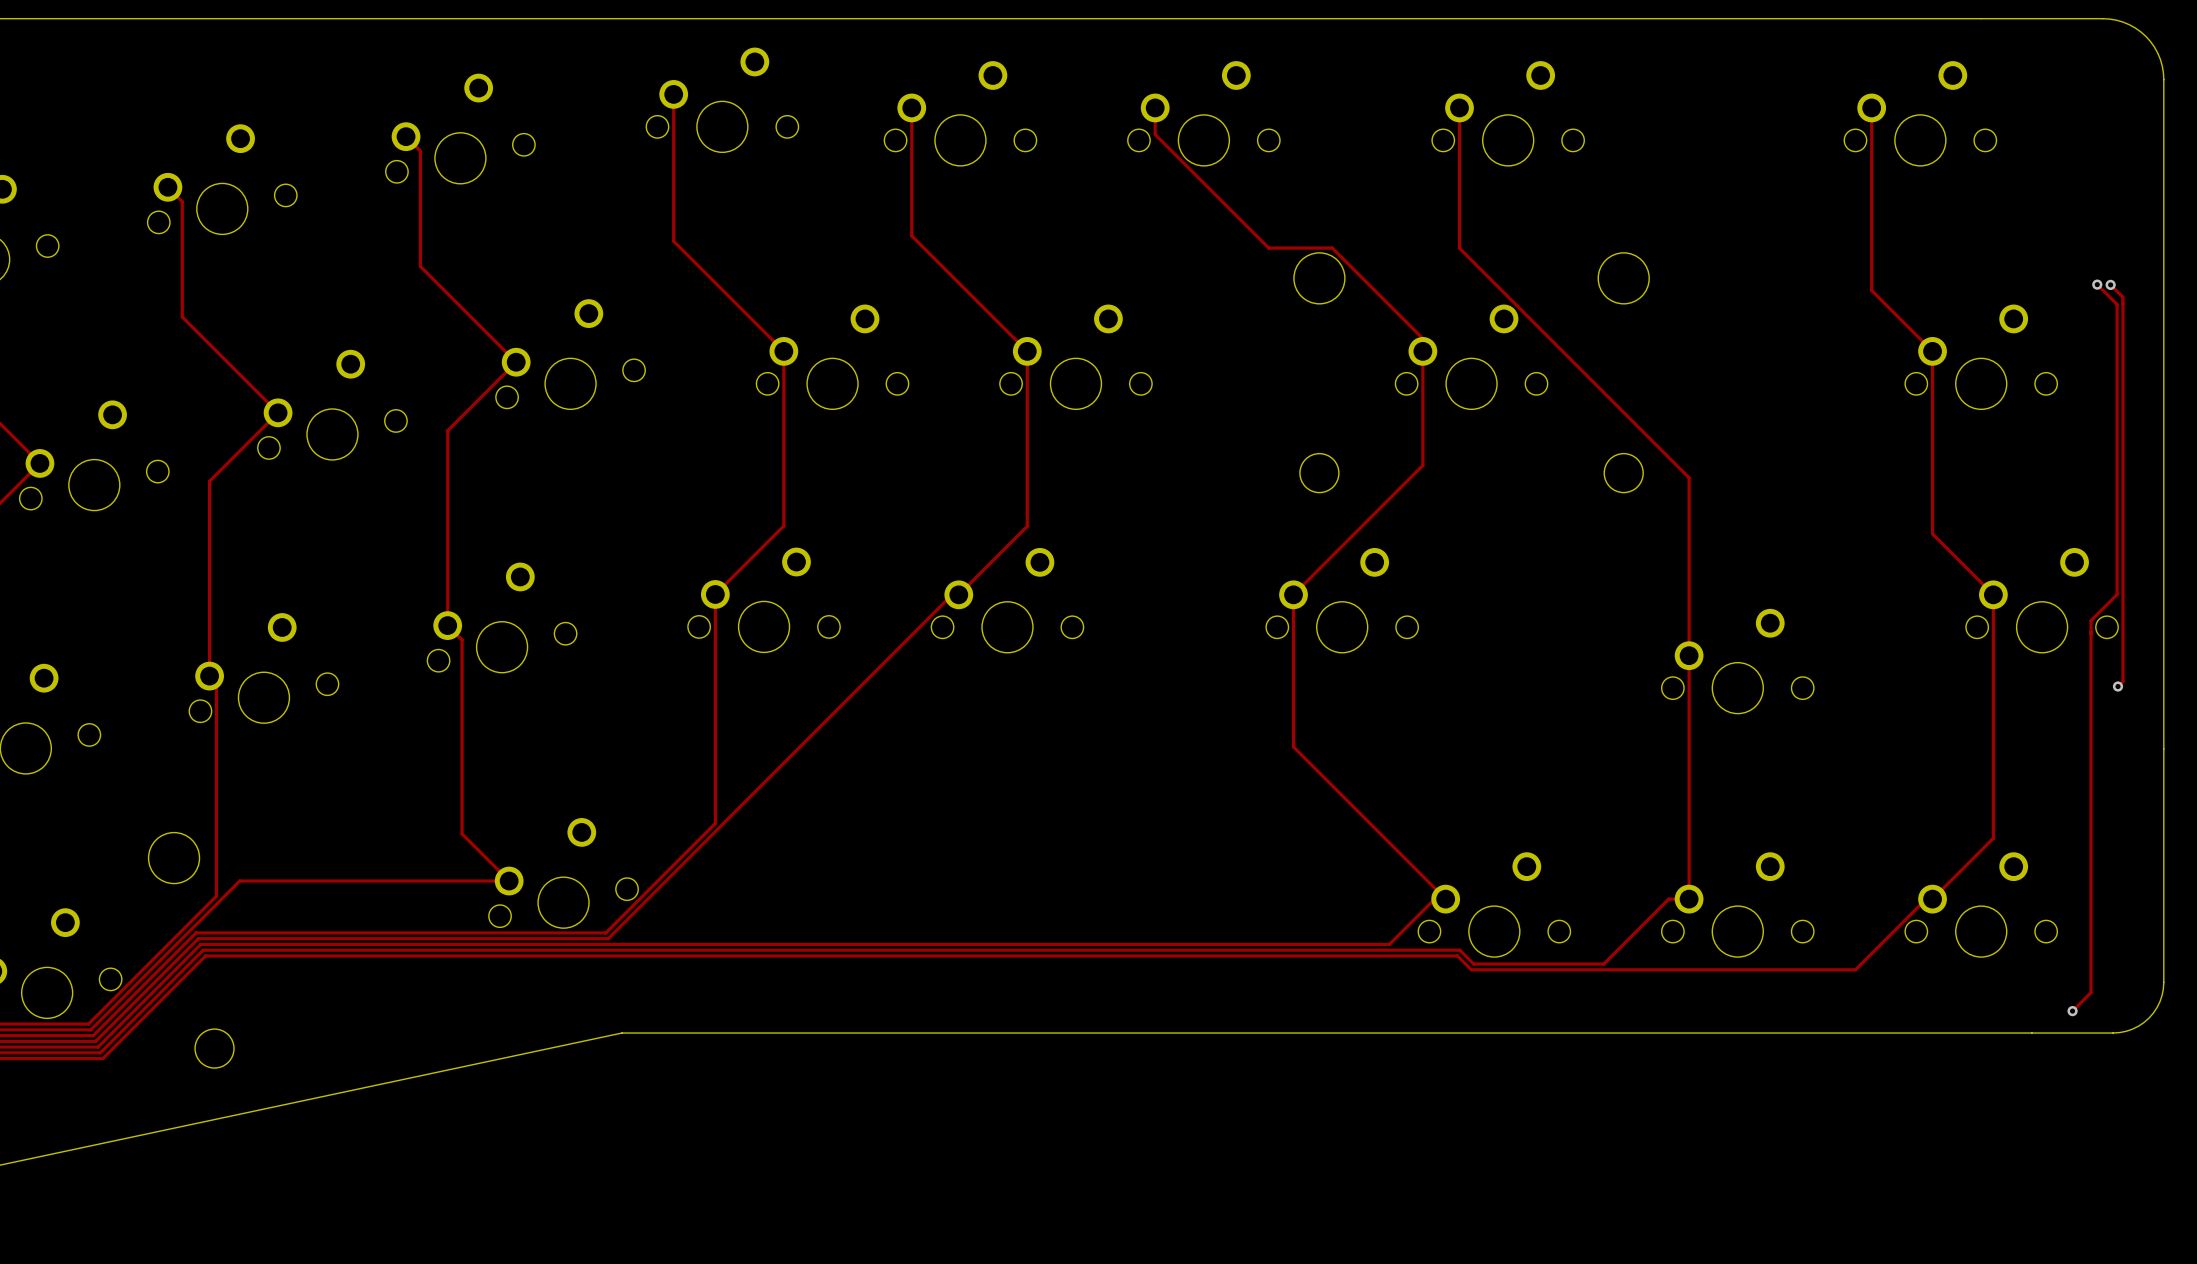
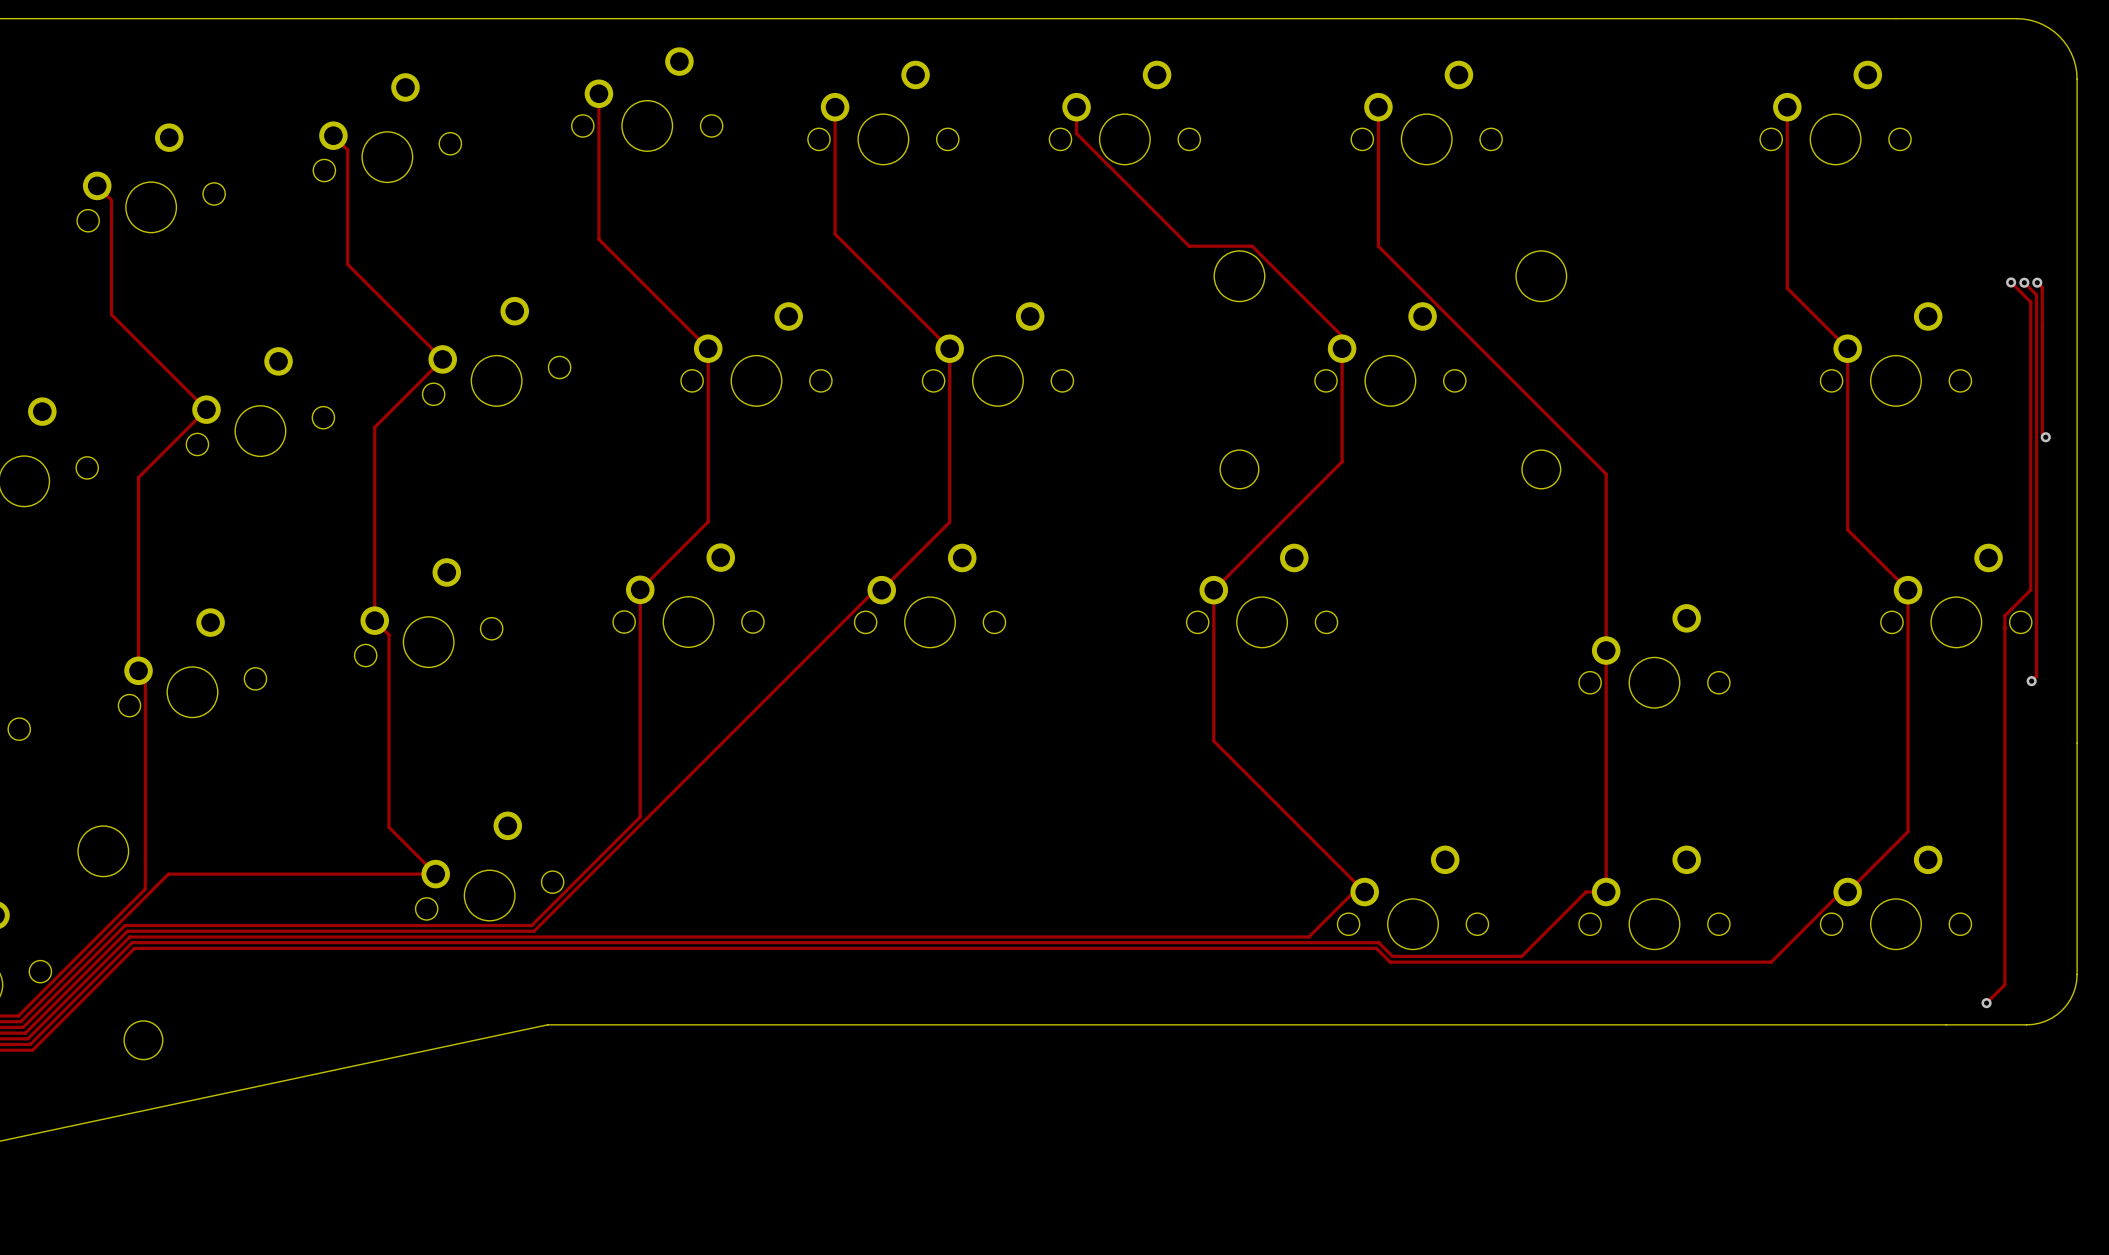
track: none -> (2037, 282) (2042, 287) (2042, 433) (2045, 437)
via: none -> (2037, 282)
via: none -> (2045, 437)

